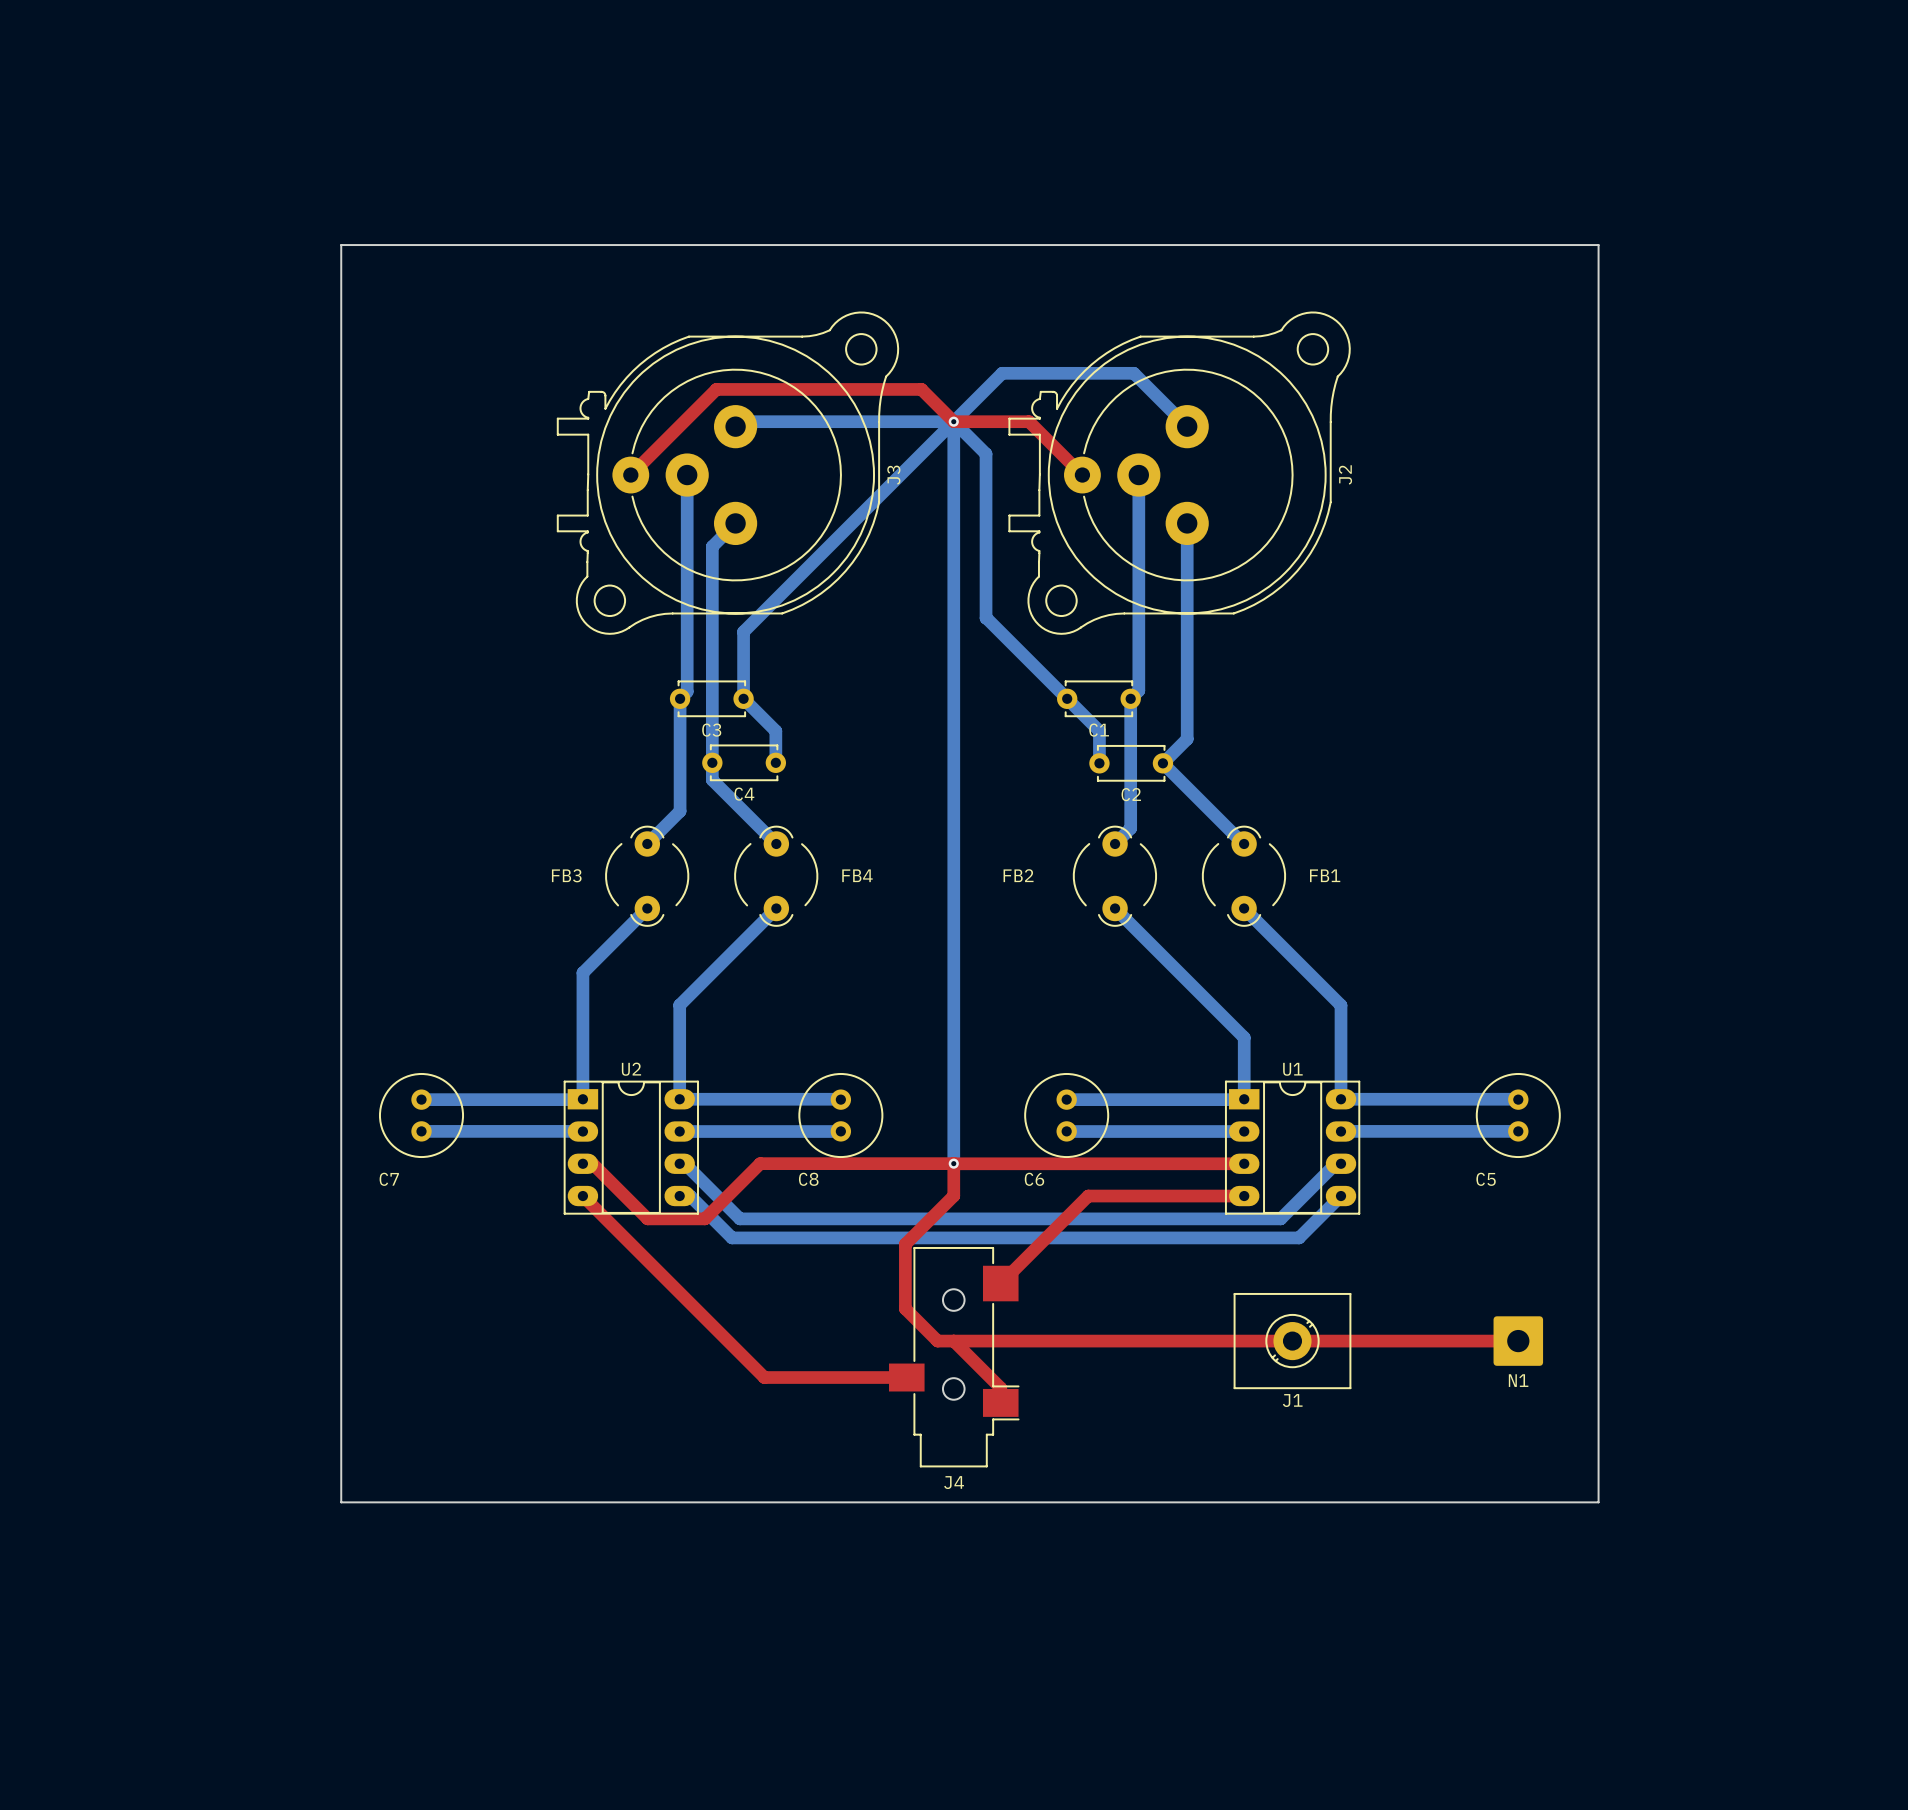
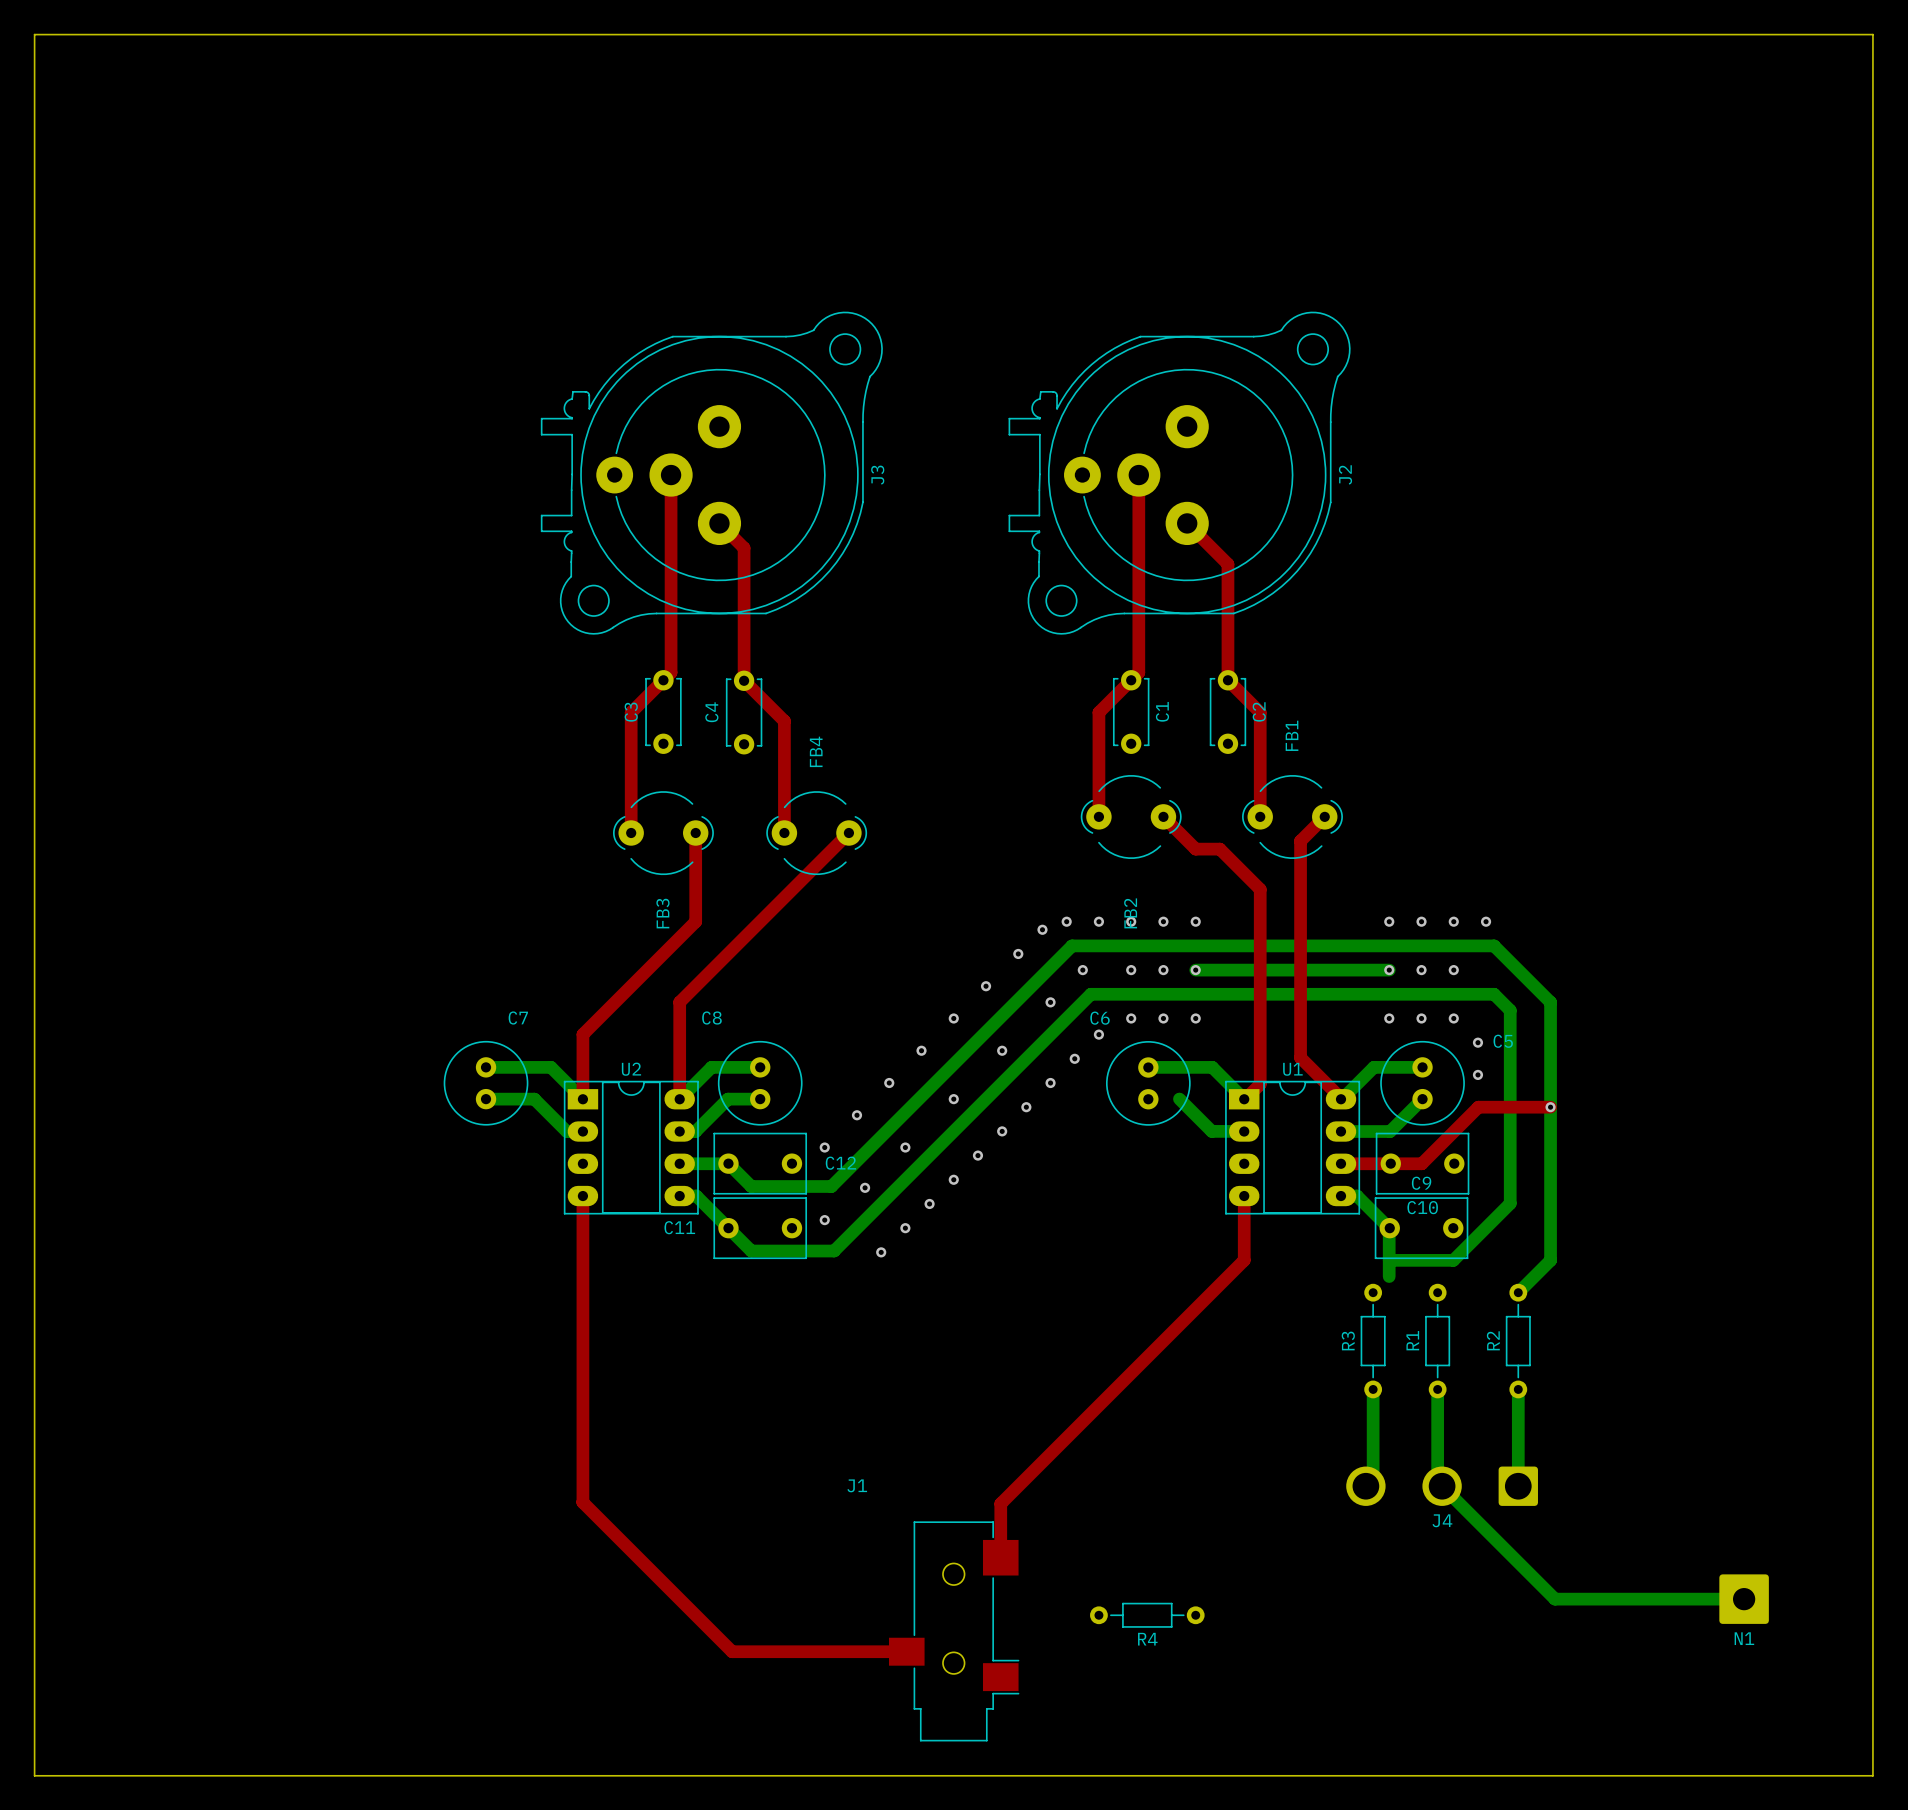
board edge: none -> (34, 34) (1872, 34) (1872, 1775) (34, 1775) (34, 34)
board edge: (341, 245) (1598, 245) (1598, 1502) (341, 1502) (341, 245) -> none
bottom track: (953, 421) (986, 453) (986, 618) (1099, 731) (1099, 763) -> none
bottom track: (953, 421) (953, 1163) -> none
bottom track: (953, 421) (740, 421) (735, 426) -> none
via: (953, 421) -> none
bottom track: (1187, 426) (1133, 373) (1002, 373) (743, 631) (743, 698) (775, 731) (775, 762) -> none
J3 position: (727, 473) -> (711, 473)
top track: (630, 475) (716, 389) (921, 389) (953, 421) (1029, 421) (1082, 475) -> none
top track: none -> (671, 475) (671, 672) (631, 712) (631, 832)
bottom track: (687, 475) (687, 691) (680, 698) (680, 811) (647, 843) -> none
bottom track: (1138, 475) (1138, 690) (1130, 698) (1130, 828) (1115, 843) -> none
top track: none -> (1138, 475) (1138, 672) (1098, 712) (1098, 816)
top track: none -> (719, 523) (744, 548) (744, 680) (784, 721) (784, 832)
bottom track: (735, 523) (712, 546) (712, 779) (776, 843) -> none
bottom track: (1187, 523) (1187, 739) (1162, 763) (1244, 843) -> none
top track: none -> (1187, 523) (1227, 564) (1227, 680) (1260, 712) (1260, 816)
C3 rotation: 0° (711, 698) -> 90° clockwise (663, 712)
C1 rotation: 0° (1098, 698) -> 90° clockwise (1131, 712)
C1 name position: C1 (1099, 730) -> C1 (1162, 711)
C4 rotation: 0° (744, 762) -> 90° clockwise (744, 712)
C4 position: (744, 762) -> (744, 712)
C2 rotation: 0° (1131, 763) -> 90° clockwise (1227, 712)
C2 position: (1131, 763) -> (1227, 712)
C2 name position: C2 (1131, 794) -> C2 (1259, 711)
top track: none -> (1163, 816) (1195, 849) (1219, 849) (1260, 889) (1260, 1084) (1245, 1099)
top track: none -> (1324, 816) (1300, 841) (1300, 1057) (1342, 1099)
top track: none -> (695, 832) (695, 921) (582, 1034) (582, 1099)
top track: none -> (848, 832) (679, 1002) (679, 1099)
FB3 rotation: 0° (647, 876) -> 90° counterclockwise (663, 833)
FB4 rotation: 0° (776, 876) -> 90° counterclockwise (816, 833)
FB2 rotation: 0° (1114, 876) -> 90° counterclockwise (1131, 816)
FB2 position: (1114, 876) -> (1131, 816)
FB1 rotation: 0° (1243, 876) -> 90° counterclockwise (1292, 816)
FB1 position: (1243, 876) -> (1292, 816)
bottom track: (647, 908) (582, 972) (582, 1099) (421, 1099) -> none
bottom track: (776, 908) (679, 1005) (679, 1099) (840, 1099) -> none
bottom track: (1115, 908) (1244, 1037) (1244, 1099) (1066, 1099) -> none
bottom track: (1244, 908) (1341, 1005) (1341, 1099) (1518, 1099) -> none
via: none -> (1066, 921)
via: none -> (1098, 921)
via: none -> (1131, 921)
via: none -> (1163, 921)
via: none -> (1195, 921)
via: none -> (1389, 921)
via: none -> (1421, 921)
via: none -> (1453, 921)
via: none -> (1486, 921)
via: none -> (1042, 929)
via: none -> (1018, 953)
via: none -> (1082, 970)
via: none -> (1131, 970)
via: none -> (1163, 970)
bottom track: none -> (1195, 970) (1389, 970)
via: none -> (1195, 970)
via: none -> (1389, 970)
via: none -> (1421, 970)
via: none -> (1453, 970)
via: none -> (986, 986)
via: none -> (1050, 1002)
via: none -> (953, 1018)
via: none -> (1131, 1018)
via: none -> (1163, 1018)
via: none -> (1195, 1018)
via: none -> (1389, 1018)
via: none -> (1421, 1018)
via: none -> (1453, 1018)
via: none -> (1098, 1034)
via: none -> (1477, 1042)
via: none -> (921, 1050)
via: none -> (1002, 1050)
via: none -> (1074, 1058)
bottom track: none -> (486, 1067) (551, 1067) (582, 1099)
bottom track: none -> (760, 1067) (711, 1067) (679, 1099)
bottom track: none -> (1147, 1067) (1212, 1067) (1244, 1099)
bottom track: none -> (1422, 1067) (1373, 1067) (1342, 1099)
via: none -> (1477, 1074)
via: none -> (889, 1083)
via: none -> (1050, 1083)
via: none -> (953, 1099)
bottom track: none -> (1422, 1099) (1390, 1131) (1342, 1131)
via: none -> (1026, 1107)
top track: none -> (1550, 1107) (1478, 1107) (1421, 1163) (1342, 1163)
via: none -> (1550, 1107)
C7 position: (421, 1115) -> (486, 1083)
C8 position: (840, 1115) -> (760, 1083)
via: none -> (857, 1115)
C6 position: (1066, 1115) -> (1148, 1083)
C5 position: (1518, 1115) -> (1422, 1083)
bottom track: (421, 1131) (582, 1131) -> (486, 1099) (534, 1099) (566, 1131) (582, 1131)
bottom track: (695, 1131) (840, 1131) -> (695, 1131) (727, 1099) (760, 1099)
via: none -> (1002, 1131)
bottom track: (1066, 1131) (1244, 1131) -> (1179, 1099) (1211, 1131) (1244, 1131)
bottom track: (1341, 1131) (1518, 1131) -> none
via: none -> (824, 1147)
via: none -> (905, 1147)
via: none -> (977, 1155)
top track: (588, 1163) (592, 1163) (647, 1218) (704, 1218) (760, 1163) (953, 1163) (953, 1195) (905, 1244) (905, 1308) (937, 1341) (1518, 1341) -> none
bottom track: (684, 1163) (739, 1218) (1280, 1218) (1335, 1163) (1341, 1163) -> (684, 1163) (728, 1163)
bottom track: none -> (728, 1163) (751, 1186) (831, 1186) (1072, 945) (1494, 945) (1550, 1002) (1550, 1260) (1518, 1292)
C12: none -> (760, 1163)
top track: (953, 1163) (1244, 1163) -> none
via: (953, 1163) -> none
C10: none -> (1422, 1163)
C7 name position: C7 (389, 1179) -> C7 (518, 1018)
C8 name position: C8 (808, 1179) -> C8 (711, 1018)
via: none -> (953, 1179)
C6 name position: C6 (1034, 1179) -> C6 (1100, 1018)
C5 name position: C5 (1486, 1179) -> C5 (1503, 1041)
via: none -> (865, 1187)
top track: (582, 1196) (764, 1377) (906, 1377) -> (582, 1196) (582, 1502)
bottom track: (690, 1196) (732, 1237) (1299, 1237) (1341, 1196) -> (690, 1196) (696, 1196) (751, 1251) (834, 1251) (1090, 994) (1494, 994) (1510, 1010) (1510, 1203) (1453, 1260) (1389, 1260)
top track: (1244, 1196) (1088, 1196) (1000, 1283) -> (1244, 1196) (1244, 1260) (1000, 1503) (1000, 1557)
bottom track: none -> (1340, 1196) (1357, 1196) (1389, 1228) (1389, 1276)
via: none -> (929, 1203)
via: none -> (824, 1220)
C11: none -> (760, 1228)
via: none -> (905, 1228)
C9: none -> (1421, 1228)
J4 footprint: [889, 1247, 1020, 1468] -> [1346, 1466, 1538, 1506]
via: none -> (881, 1252)
J1 footprint: [1233, 1293, 1352, 1389] -> [889, 1521, 1020, 1742]
top track: (953, 1341) (1000, 1388) (1000, 1402) -> none
R3: none -> (1373, 1341)
R1: none -> (1437, 1341)
N1 position: (1518, 1341) -> (1744, 1599)
R2: none -> (1518, 1341)
bottom track: none -> (1373, 1389) (1373, 1478) (1365, 1486)
bottom track: none -> (1437, 1389) (1437, 1481) (1555, 1599) (1744, 1599)
bottom track: none -> (1518, 1389) (1518, 1470)
J1 name position: J1 (1292, 1400) -> J1 (857, 1485)
J4 name position: J4 (954, 1482) -> J4 (1442, 1520)
top track: none -> (582, 1502) (732, 1651) (906, 1651)
R4: none -> (1147, 1615)

